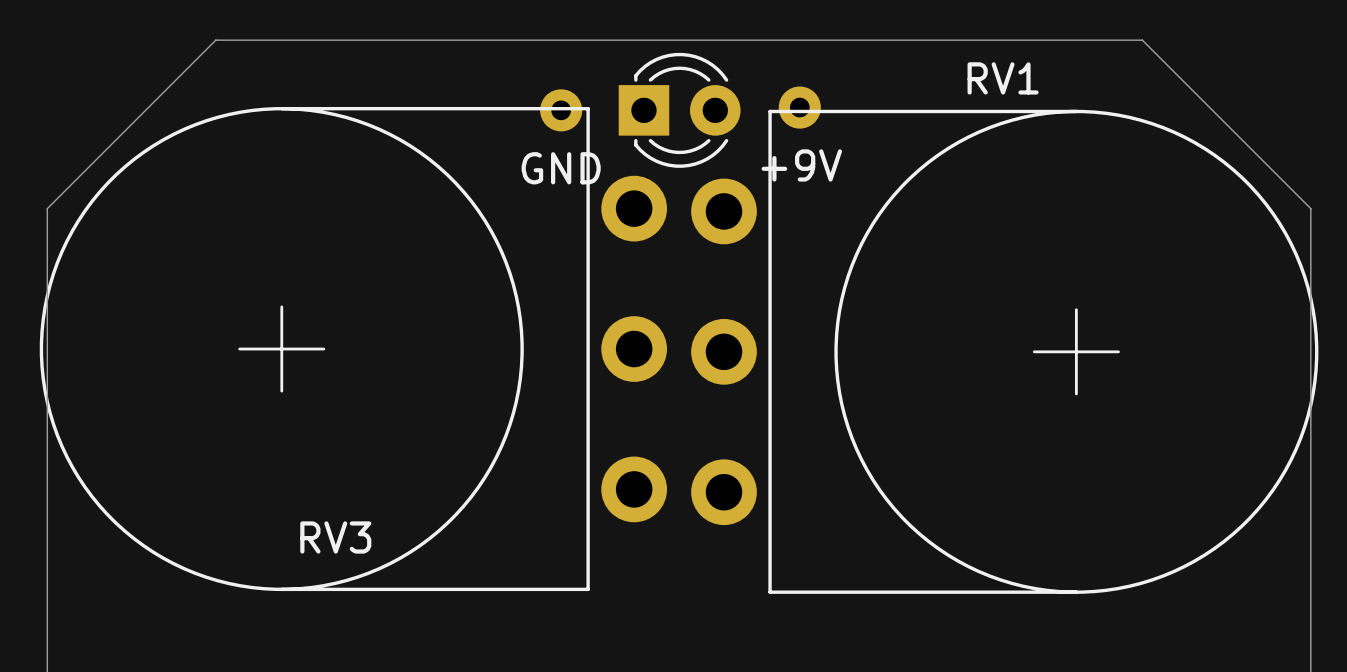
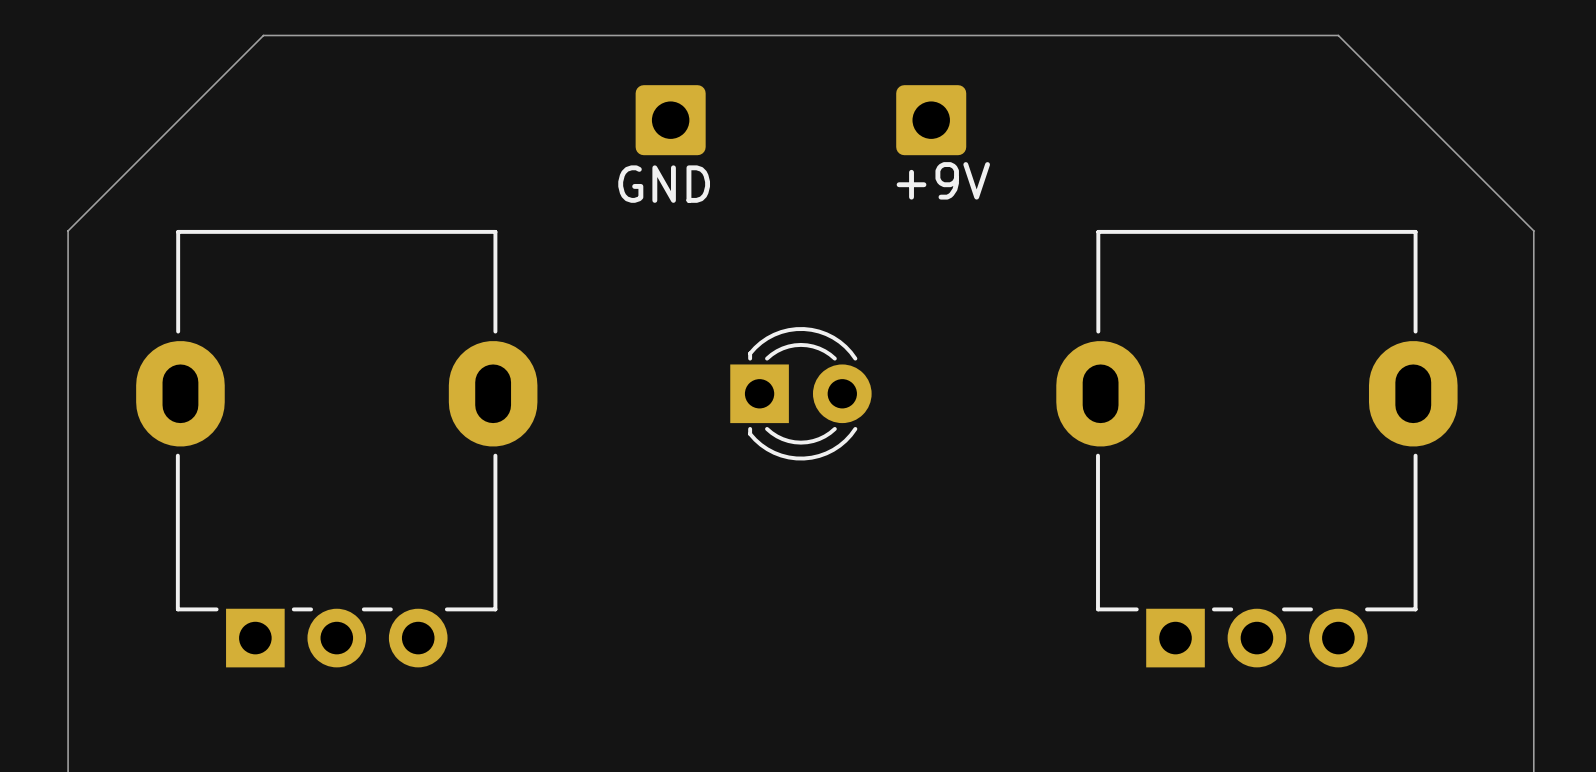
part footprint: [778, 86, 821, 129] -> [896, 85, 967, 156]
part footprint: [540, 89, 583, 132] -> [635, 85, 706, 156]
part position: (679, 110) -> (800, 393)
RV3: (353, 349) -> none
RV1: (1004, 351) -> none
part: none -> (336, 448)
part: none -> (1256, 448)

